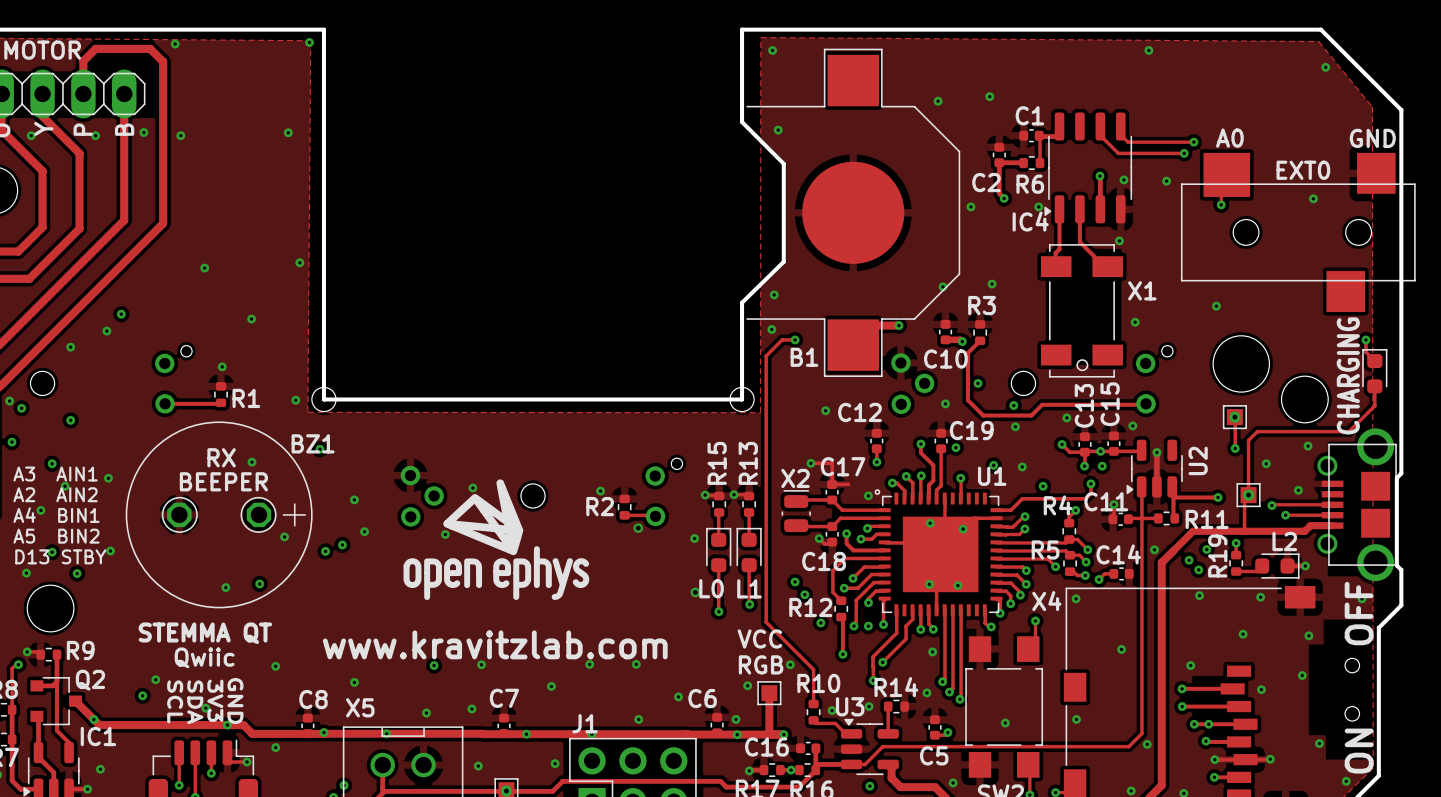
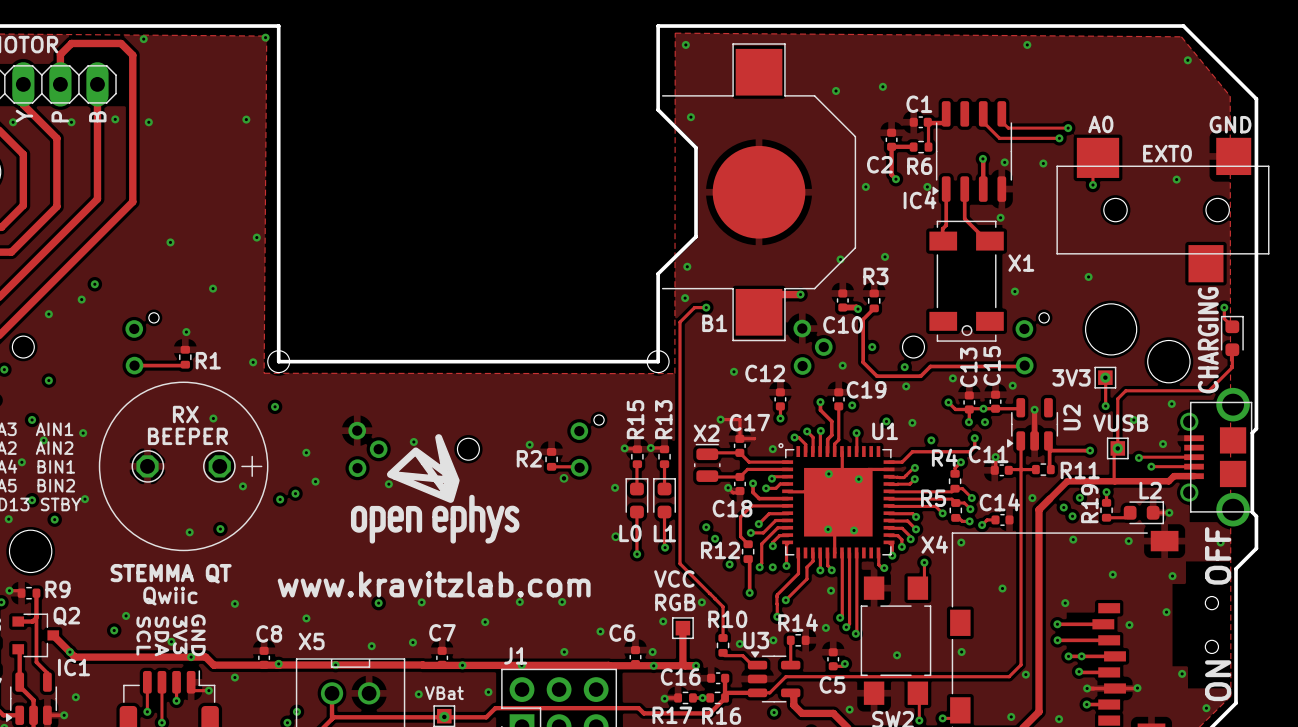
part value: none -> 3V3 (1071, 377)
BZ1 name: BZ1 (313, 443) -> none
part value: none -> VUSB (1120, 423)
part value: none -> VBat (444, 693)

